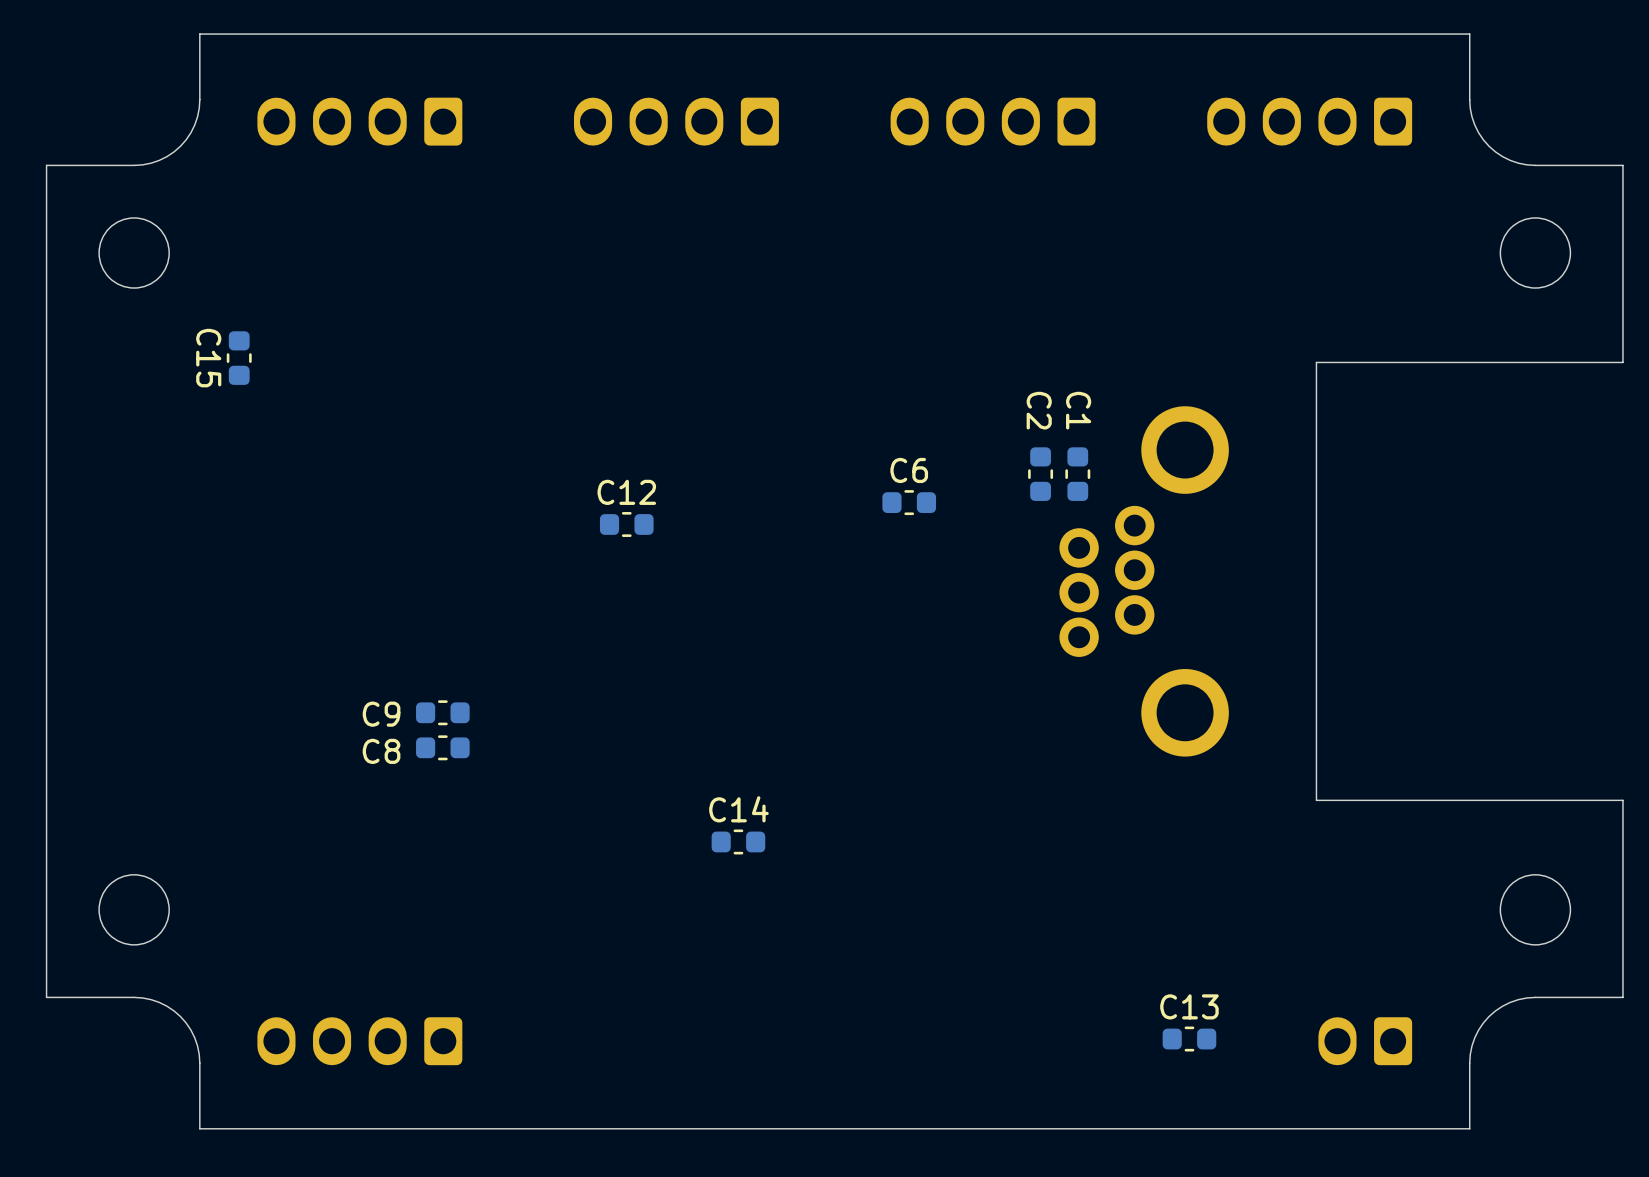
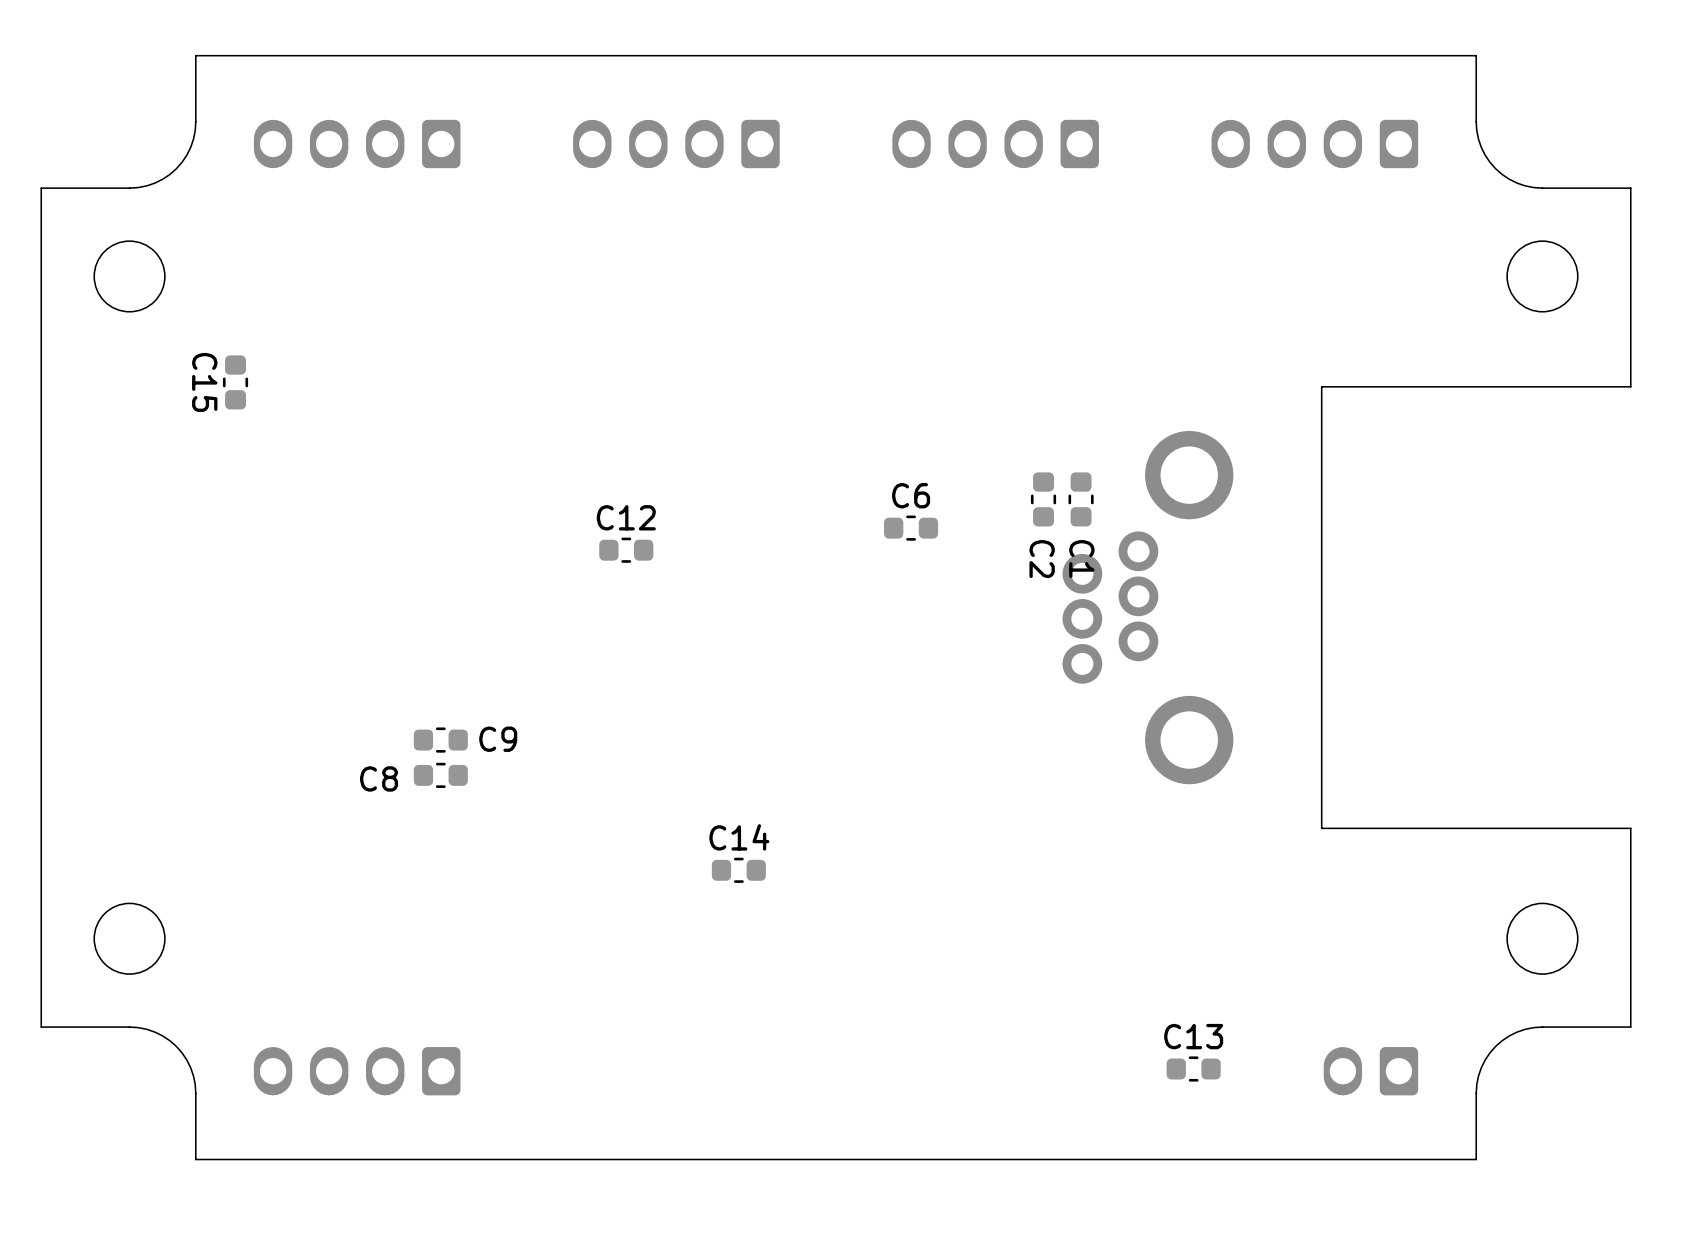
C2 name position: C2 (1039, 410) -> C2 (1042, 559)
C1 name position: C1 (1078, 410) -> C1 (1081, 559)
C9 name position: C9 (381, 714) -> C9 (498, 739)

